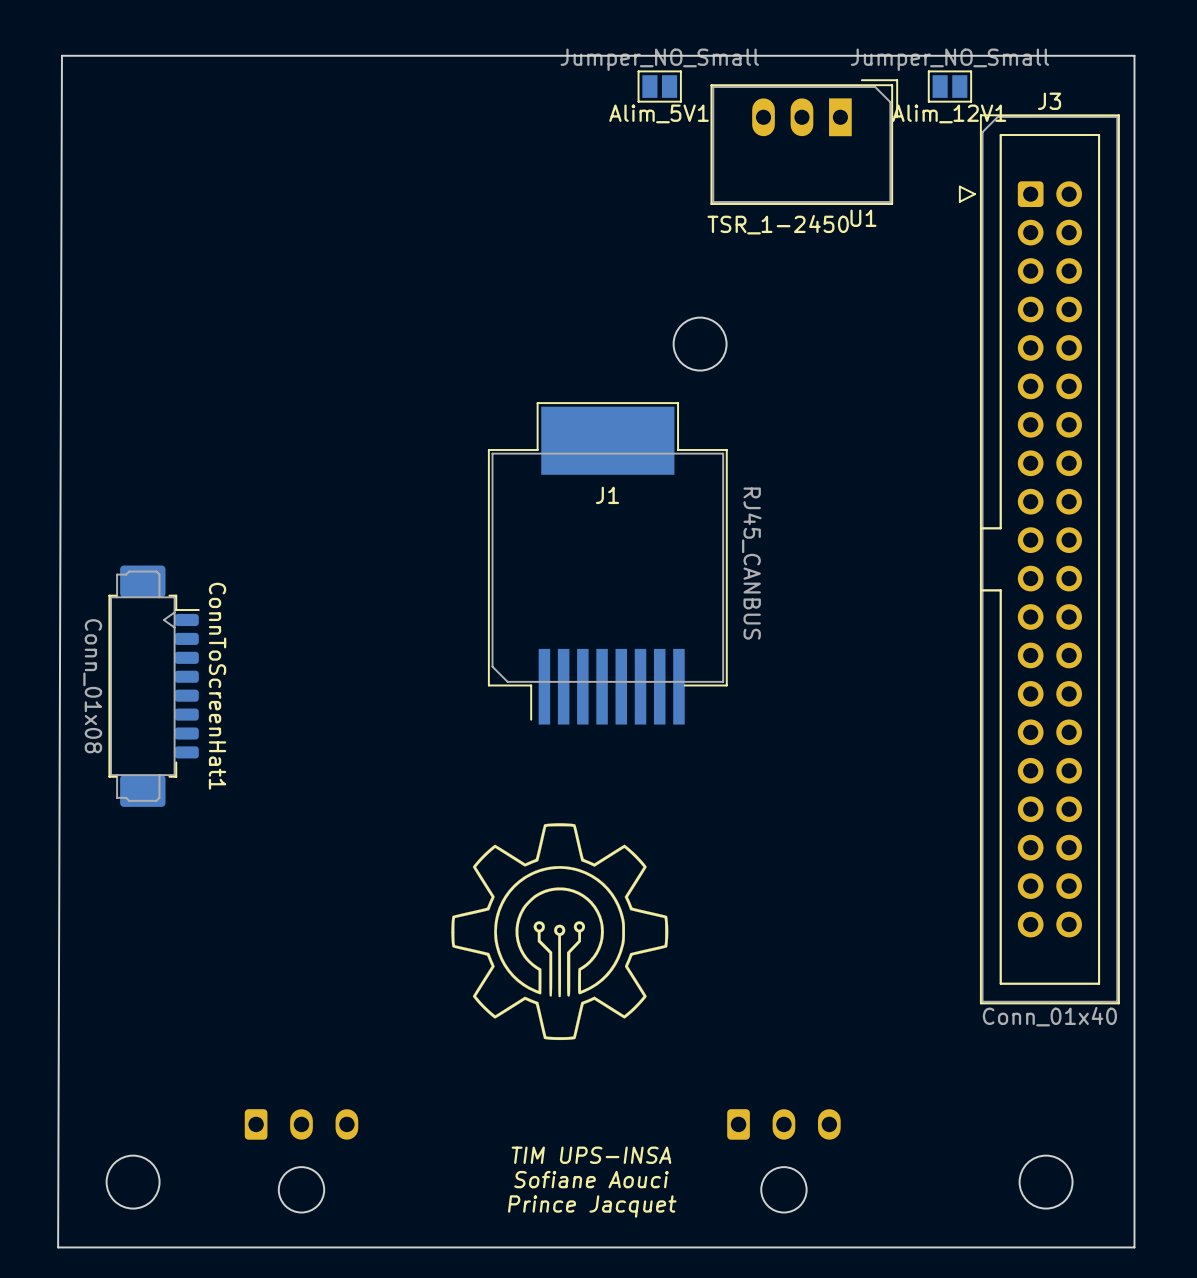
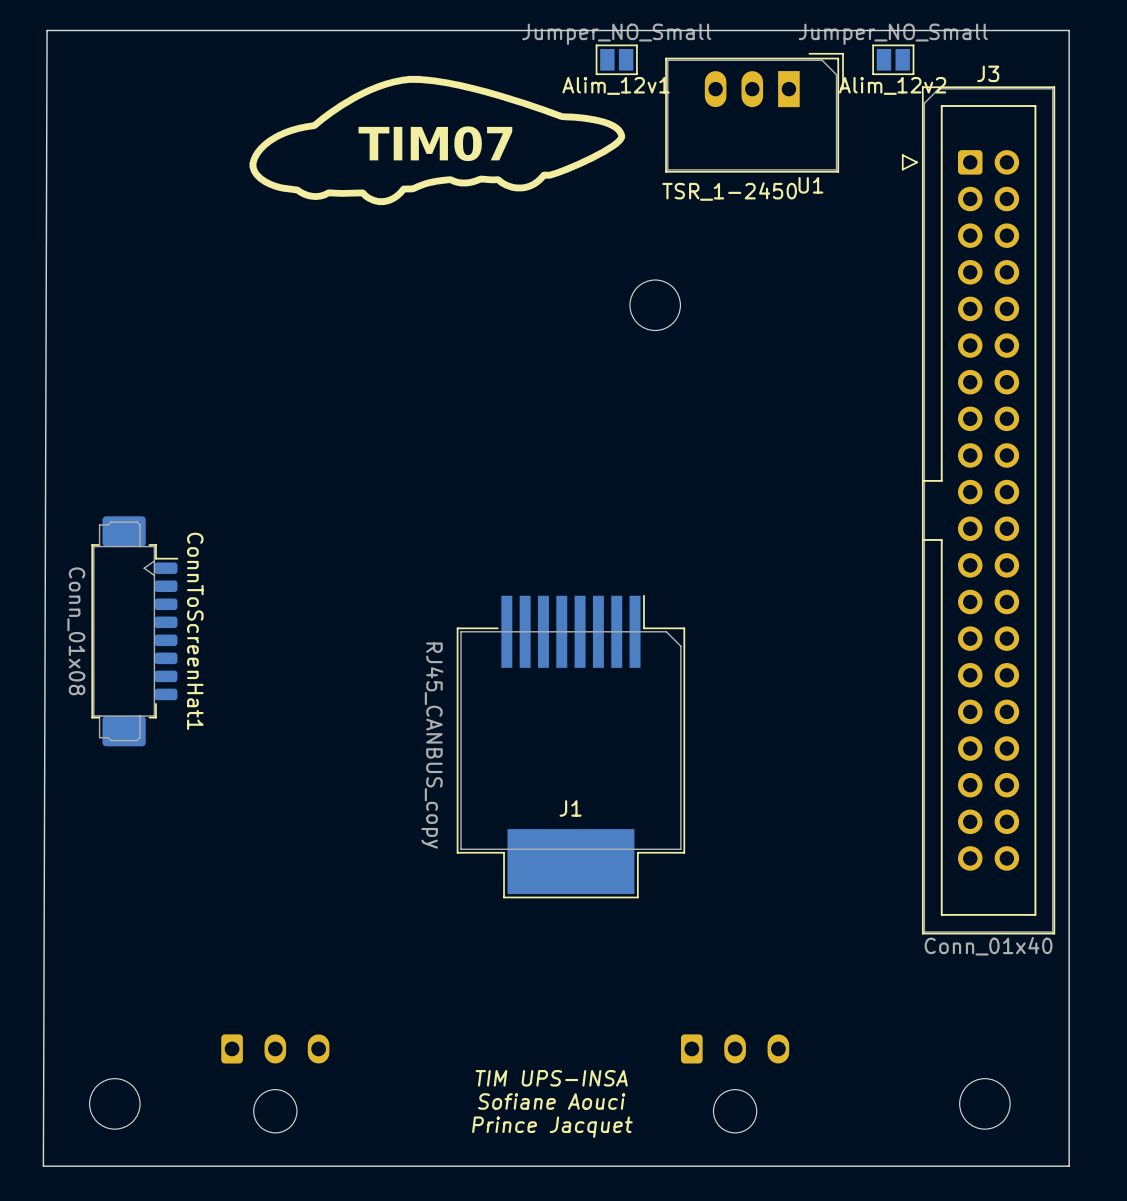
drawing: none -> [249, 75, 626, 206]
Alim_5V1 name: Alim_5V1 (659, 113) -> Alim_12v1 (616, 85)
Alim_12V1 name: Alim_12V1 (949, 113) -> Alim_12v2 (892, 85)
J1 footprint: [487, 402, 728, 725] -> [456, 594, 686, 899]
J1 name position: J1 (607, 495) -> J1 (570, 808)
J1 value: RJ45_CANBUS (751, 563) -> RJ45_CANBUS_copy (432, 745)
drawing: [451, 823, 669, 1041] -> none

